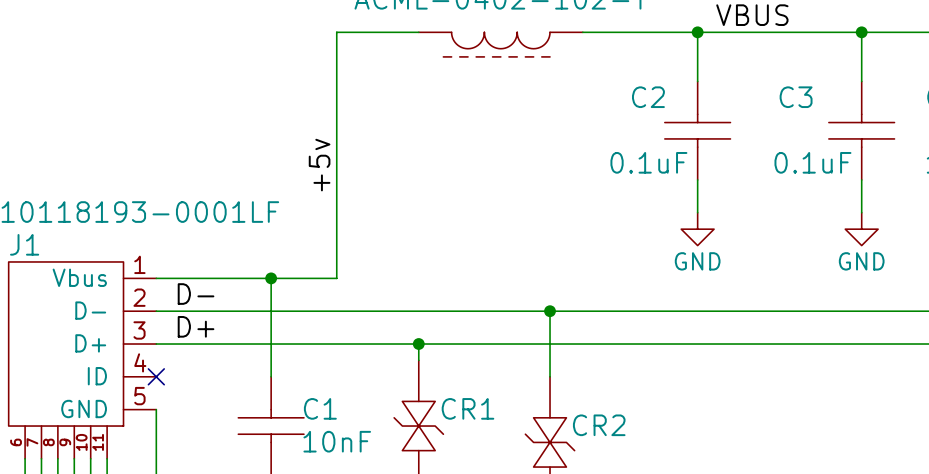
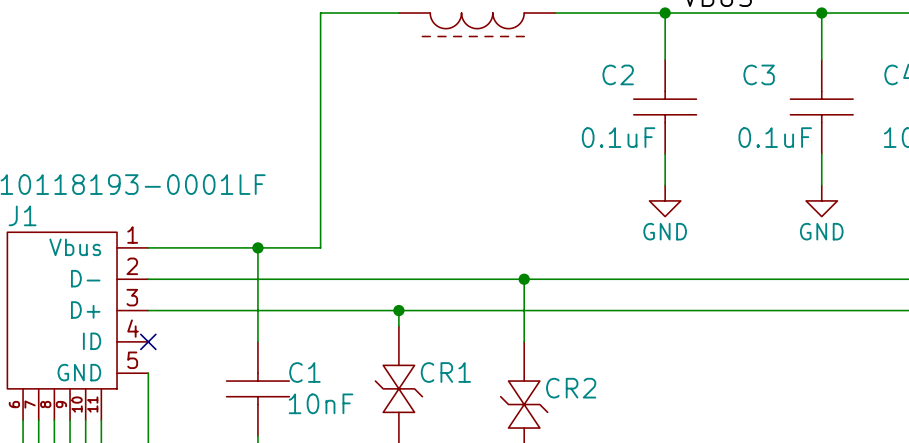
label: +5v (319, 165) -> none
label: D- (196, 294) -> none
label: D+ (196, 326) -> none

